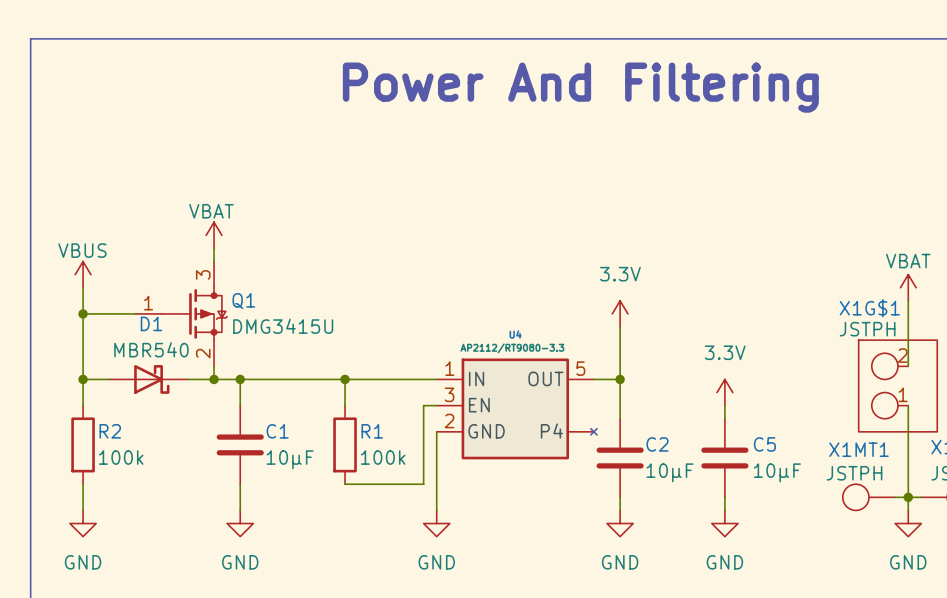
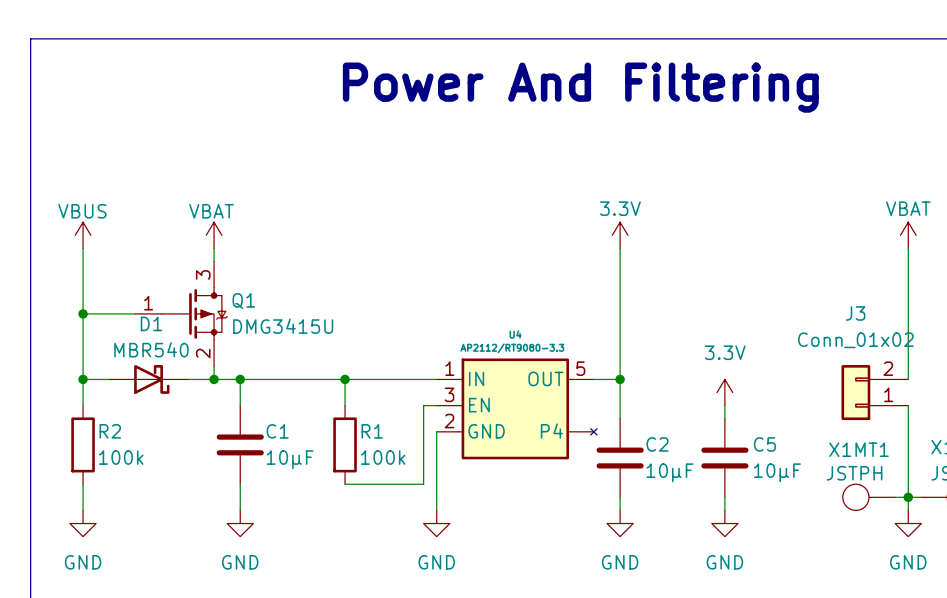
wire: none -> (620, 248) (620, 327)
power symbol position: VBUS (83, 274) -> VBUS (83, 235)
power symbol text position: 3.3V (620, 274) -> 3.3V (620, 208)
power symbol position: VBAT (908, 287) -> VBAT (908, 235)
power symbol position: 3.3V (620, 313) -> 3.3V (620, 235)
wire: none -> (908, 366) (908, 379)
X1G$1: JSTPH (897, 385) -> none
J3: none -> Conn_01x02 (874, 392)

